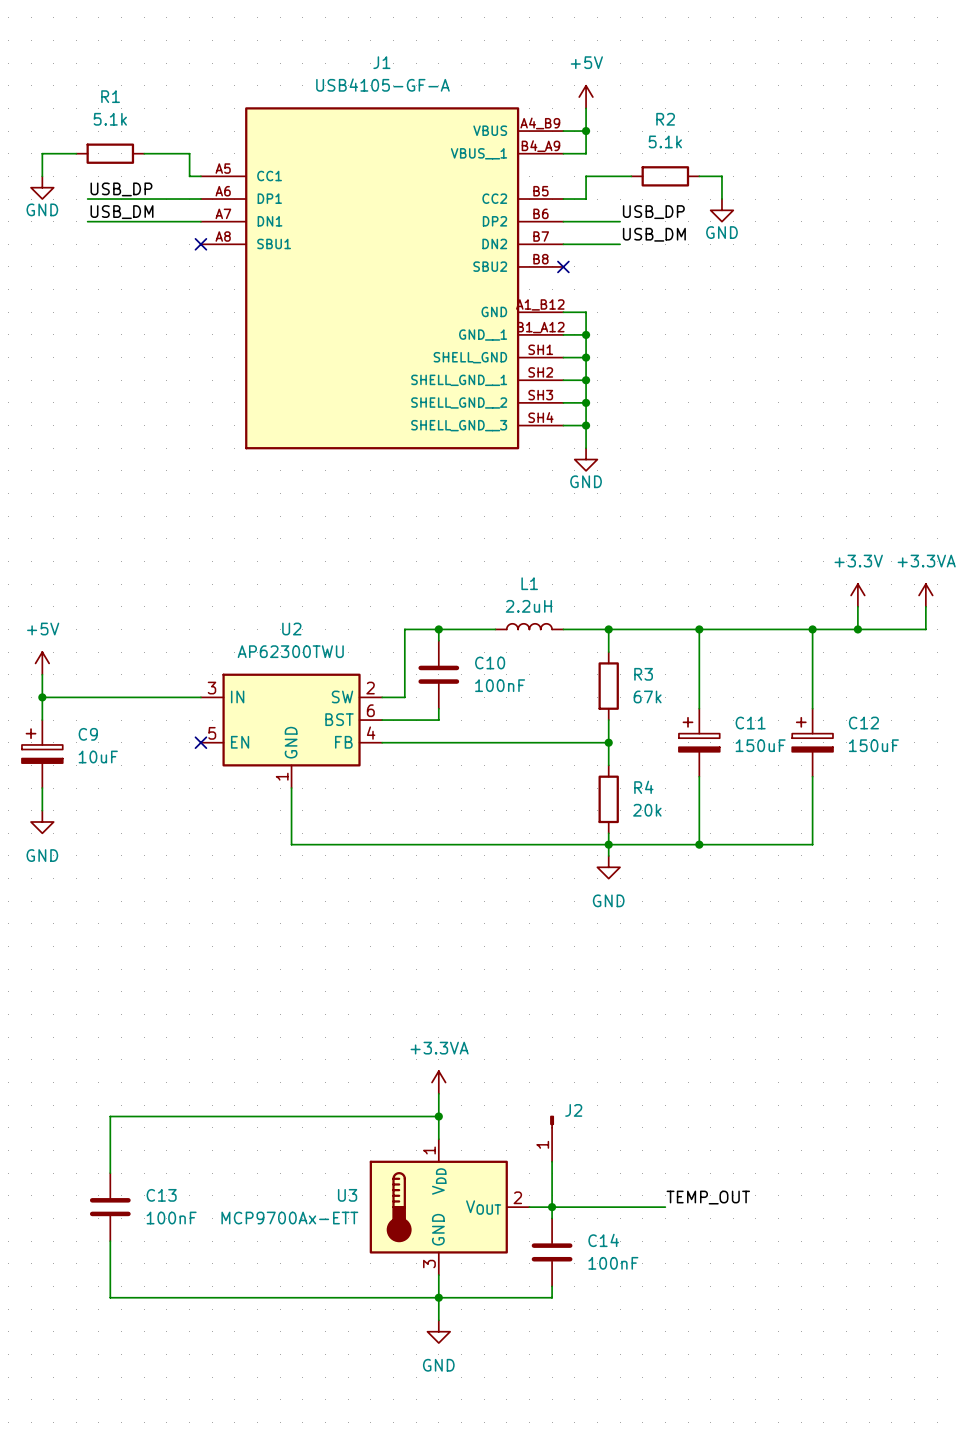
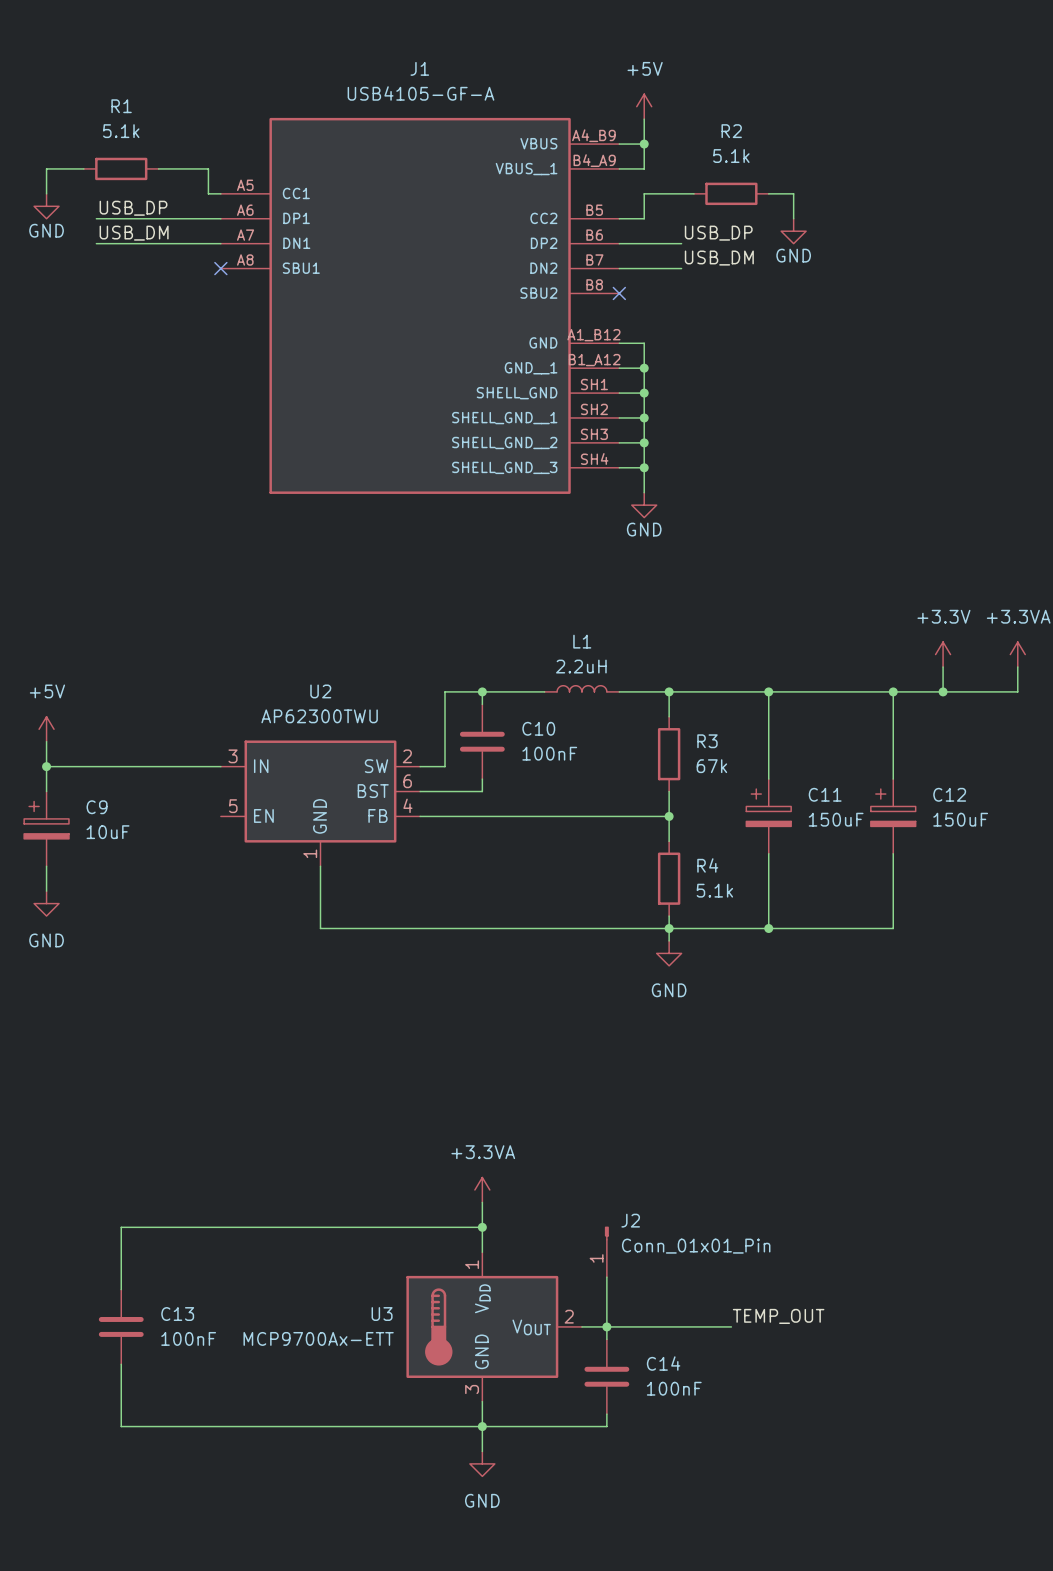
no-connect mark: (200, 742) -> none
R4 value: 20k (647, 810) -> 5.1k (714, 890)
J2 value: none -> Conn_01x01_Pin (696, 1246)

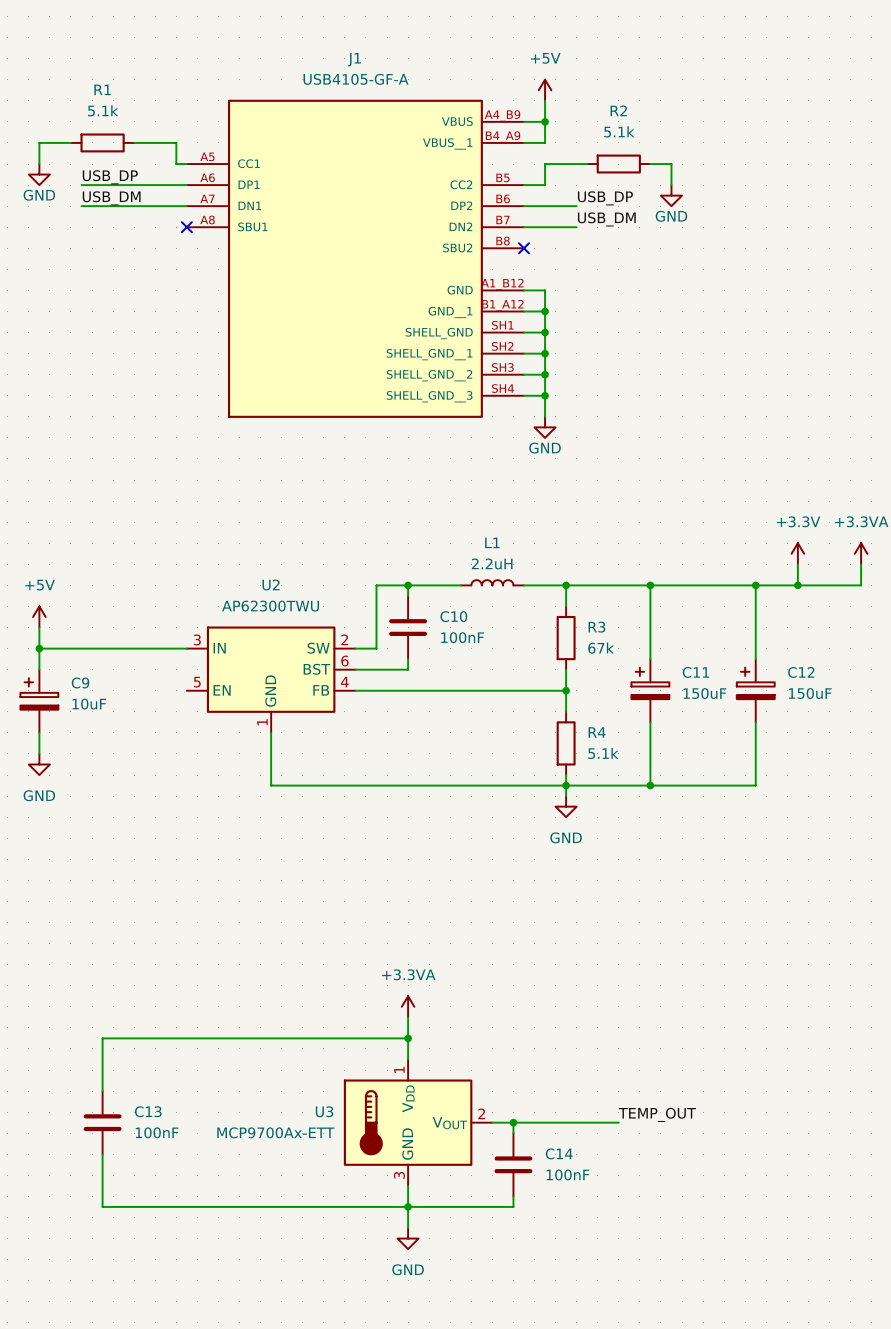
J2: Conn_01x01_Pin (606, 1251) -> none
wire: (606, 1277) (606, 1326) -> none

